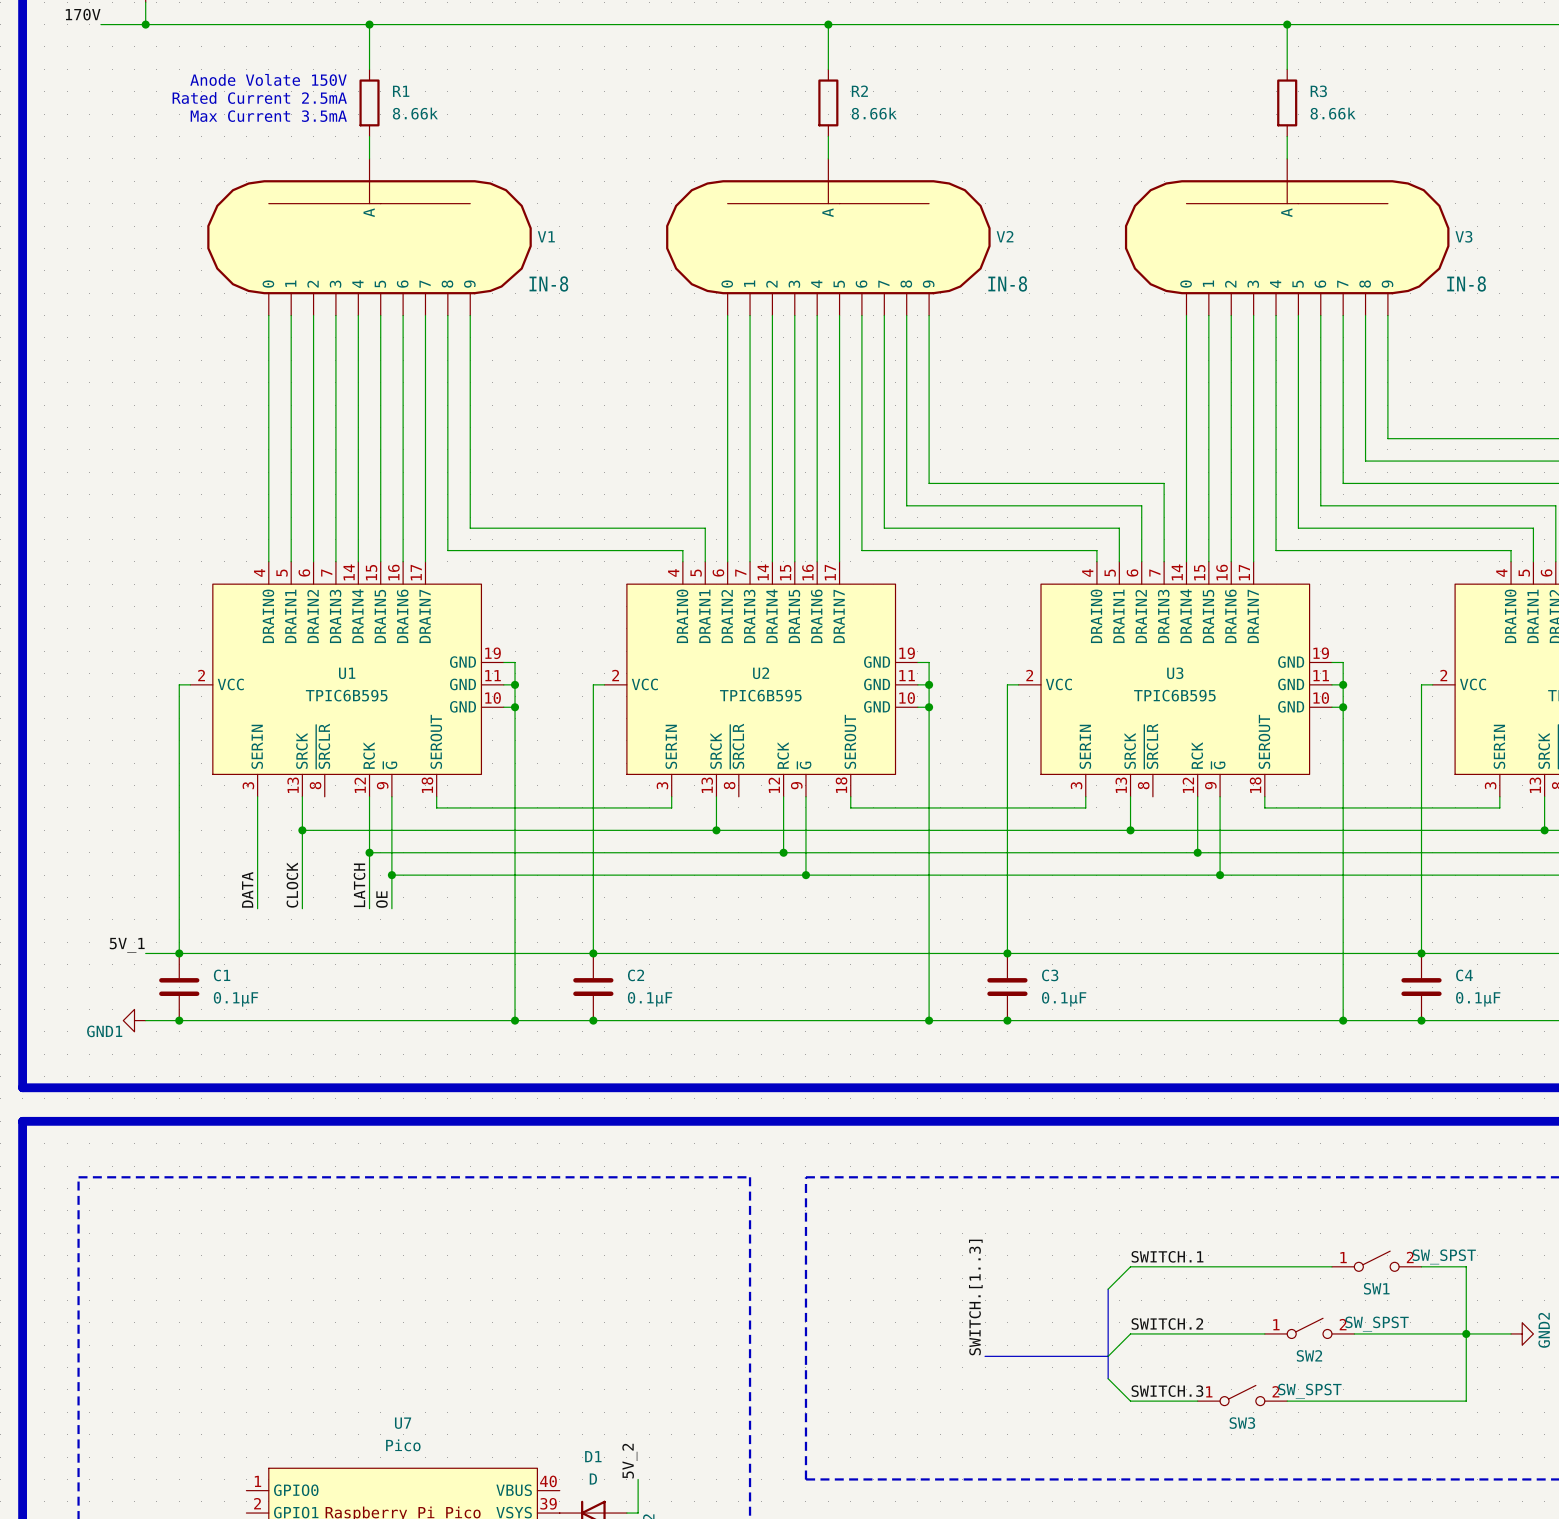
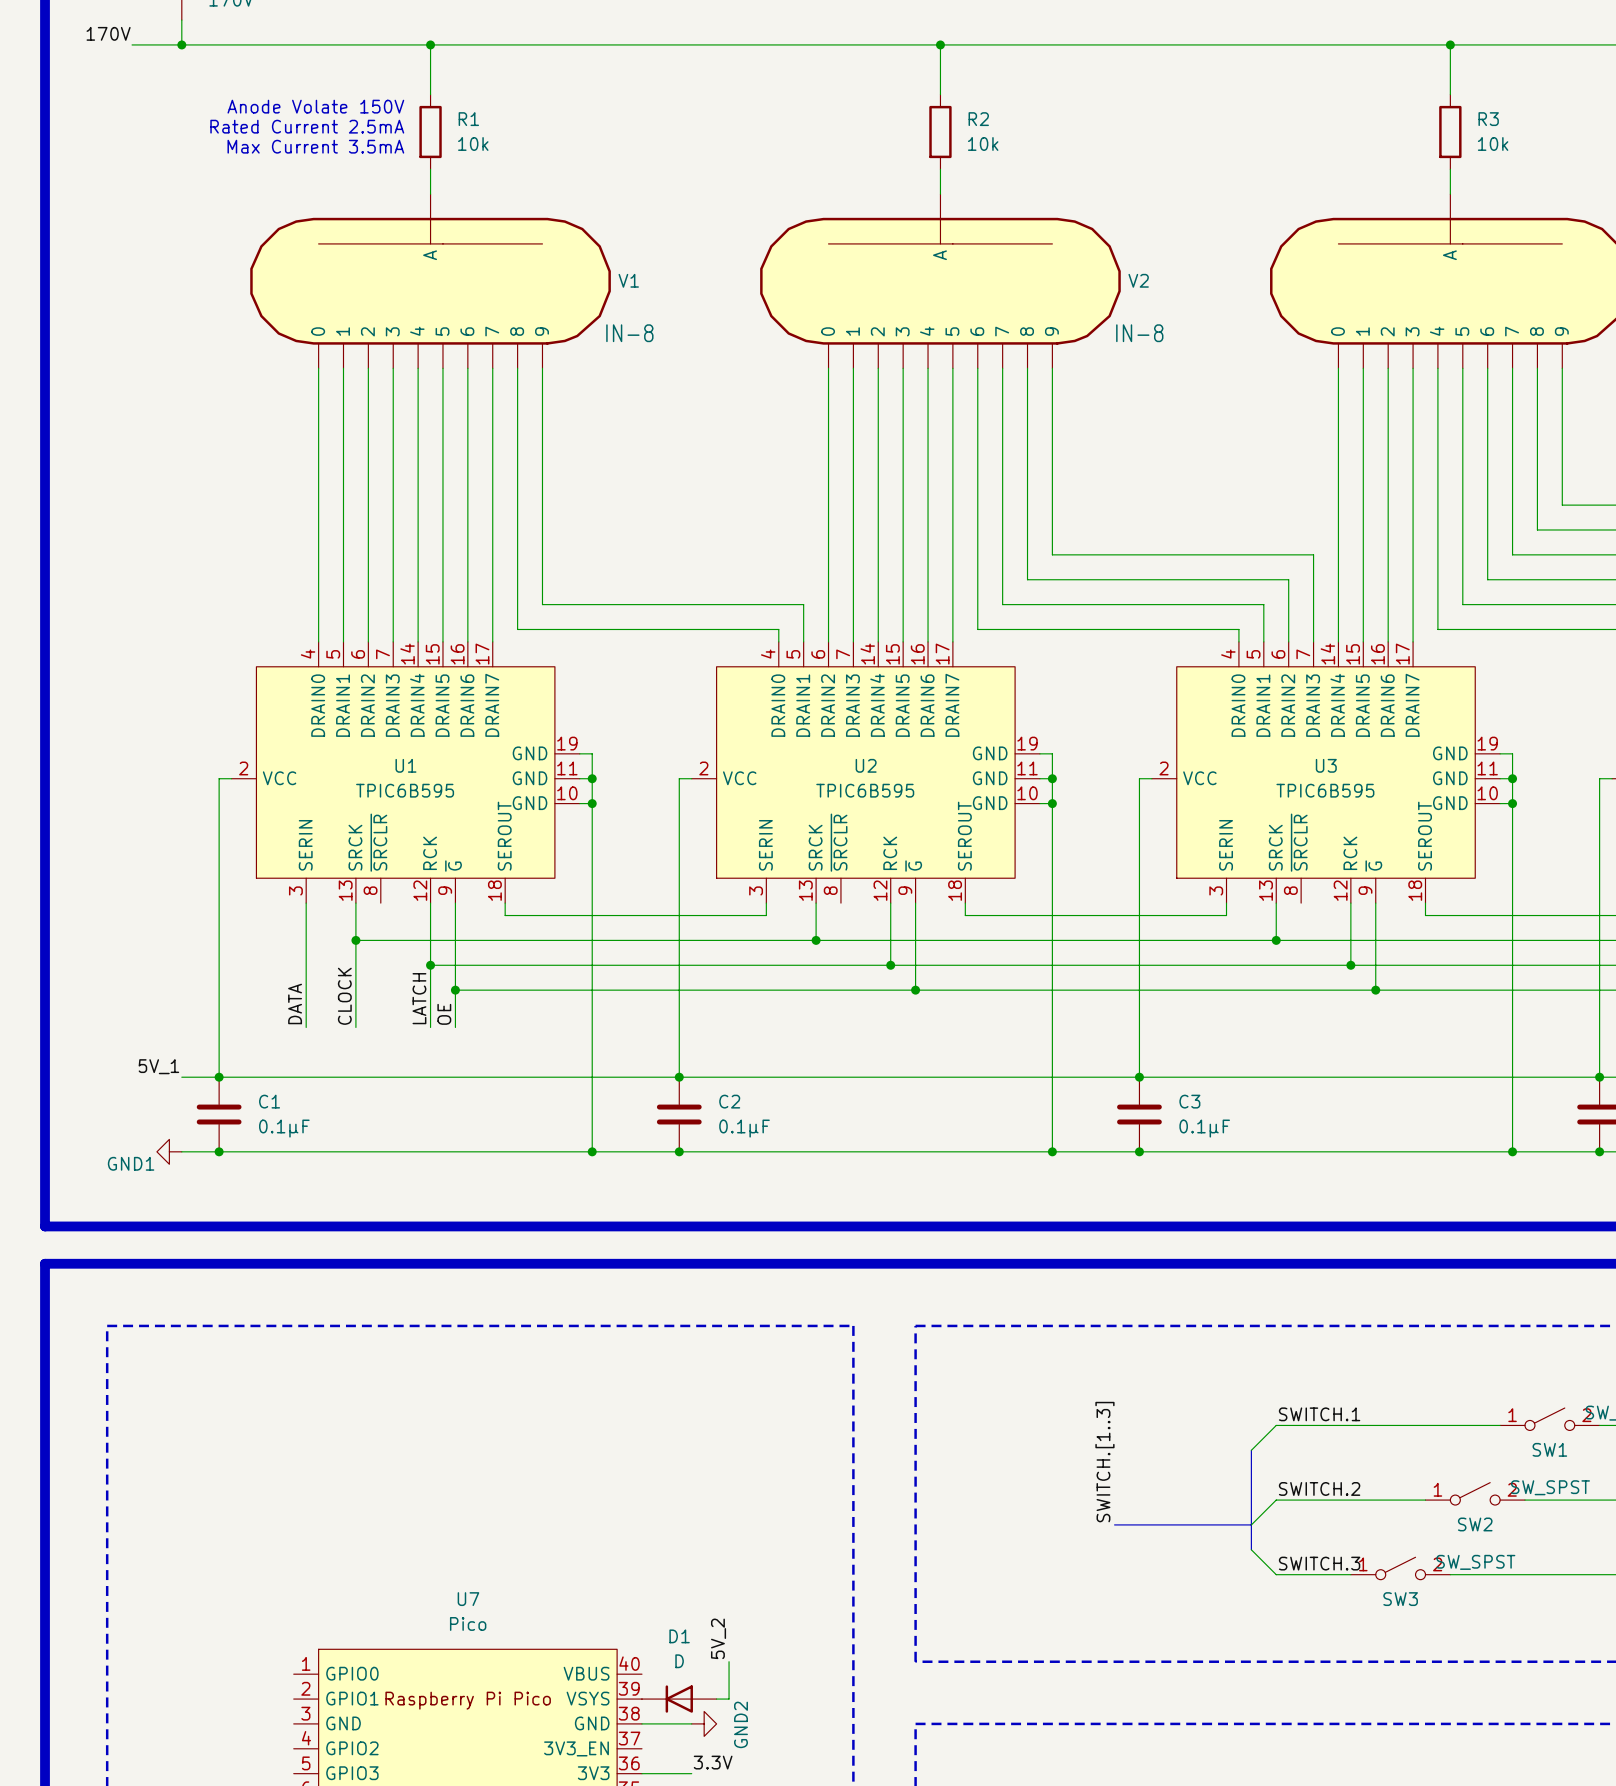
R1 value: 8.66k (415, 113) -> 10k (473, 143)
R2 value: 8.66k (874, 113) -> 10k (983, 143)
R3 value: 8.66k (1333, 113) -> 10k (1493, 143)

